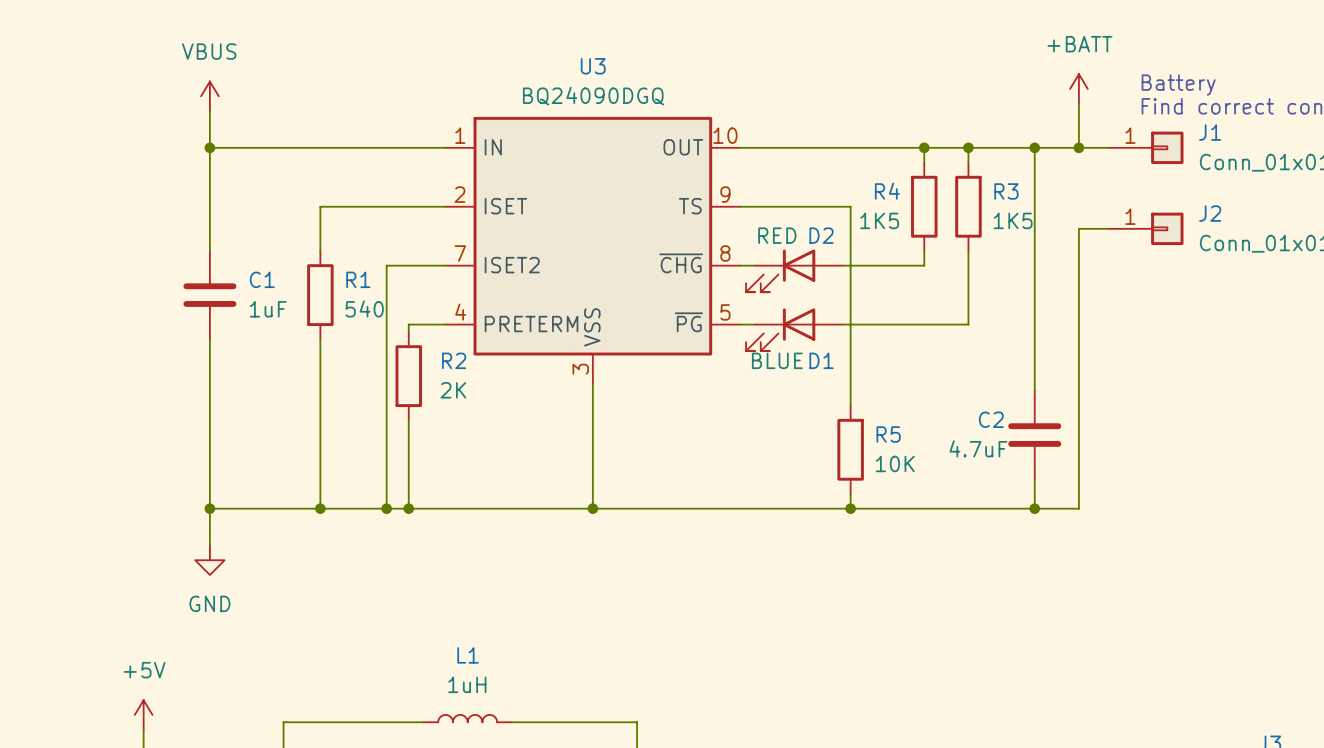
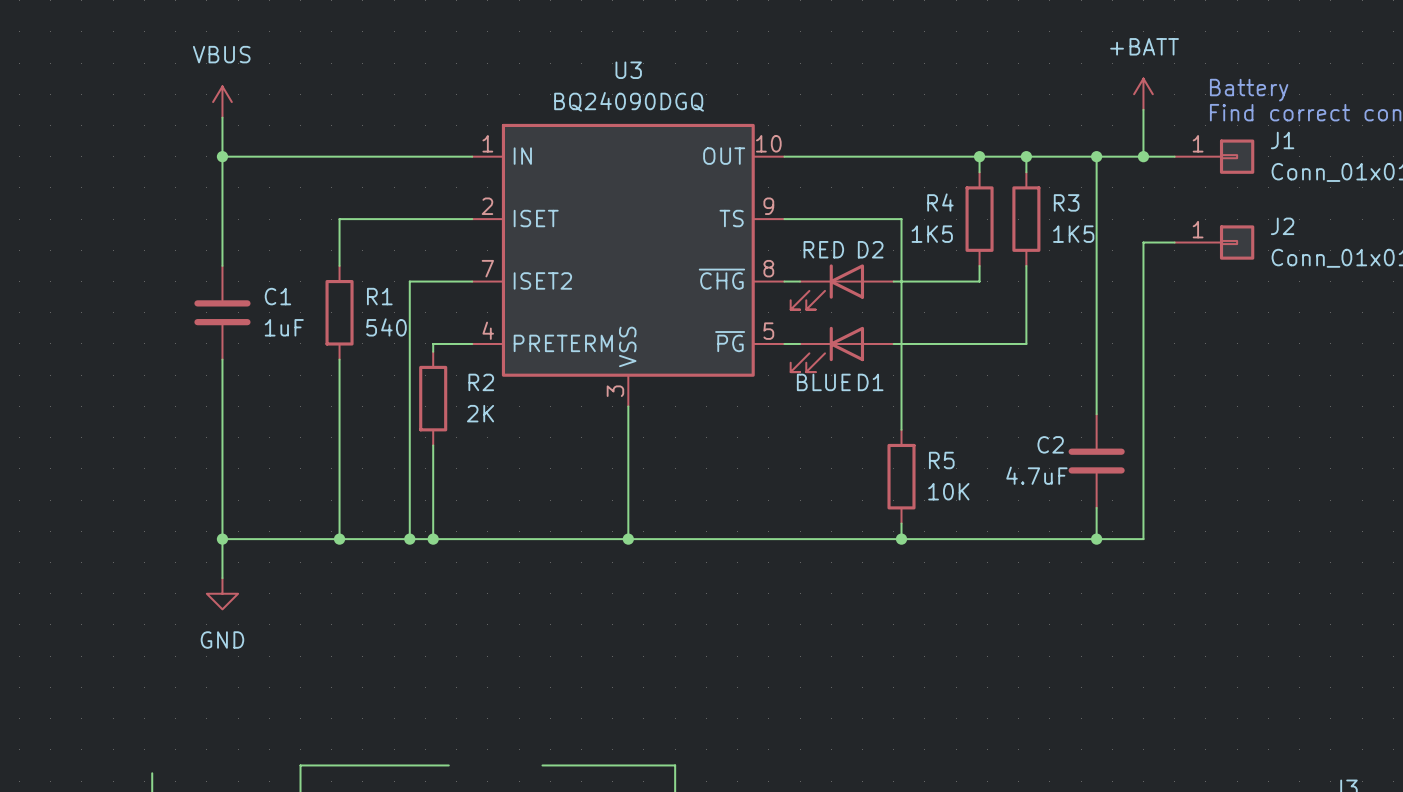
power symbol: +5V (143, 714) -> none
L1: 1uH (467, 718) -> none

